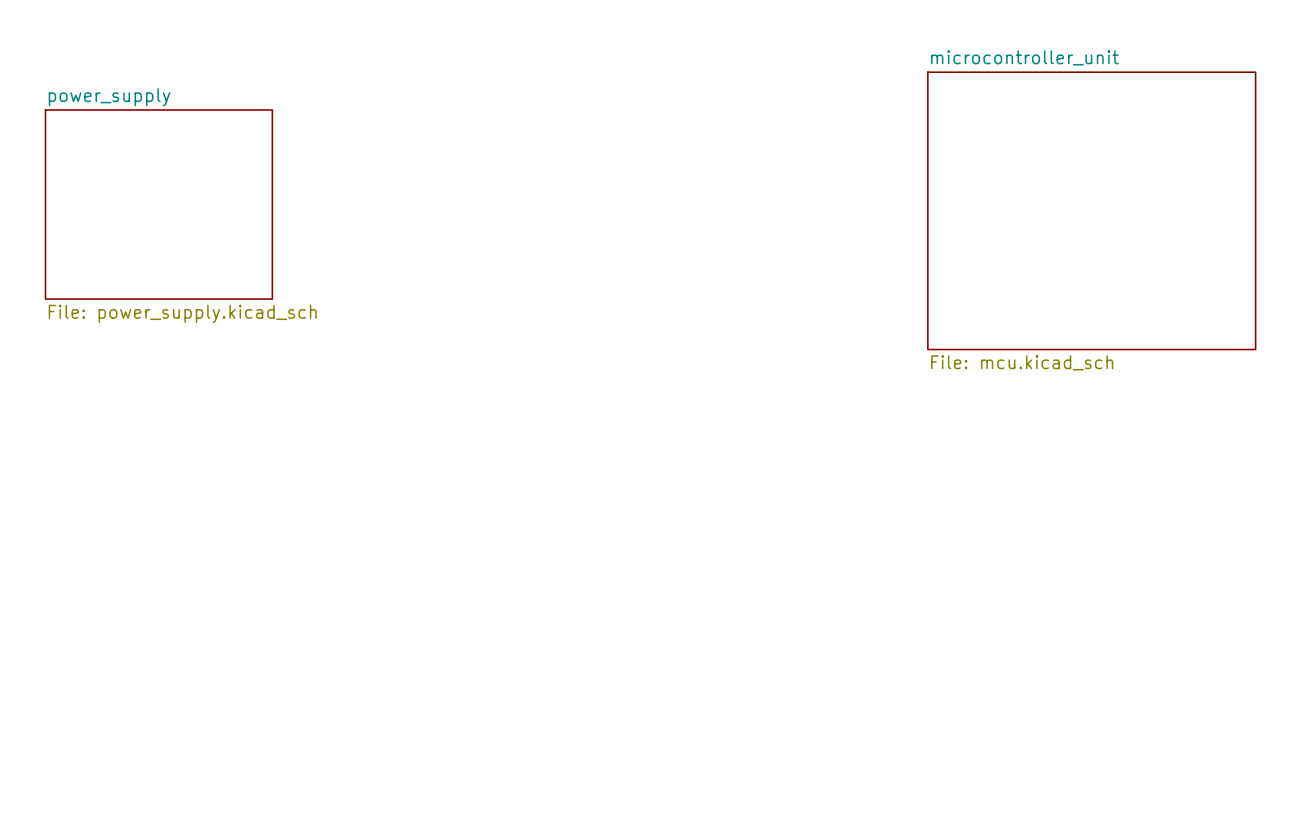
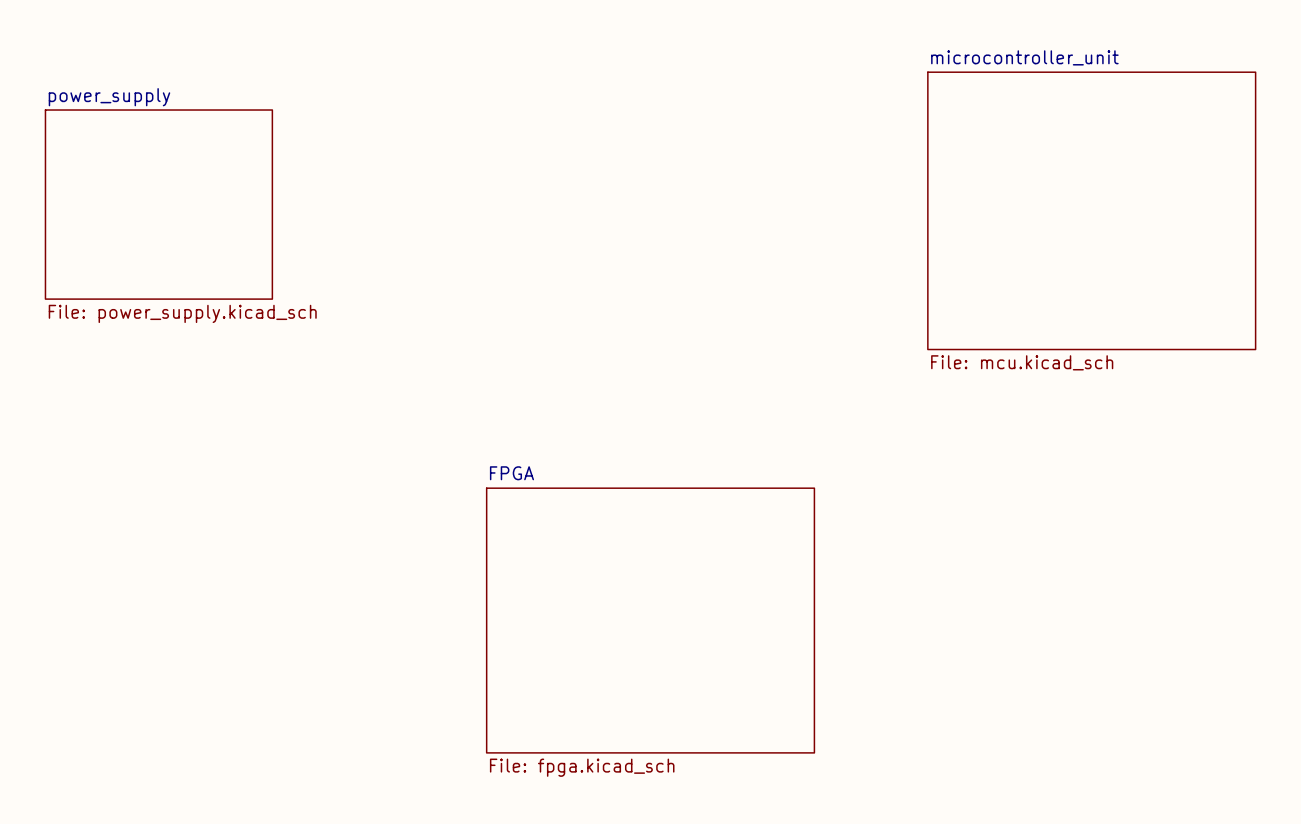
sheet FPGA: none -> File: fpga.kicad_sch (650, 620)

